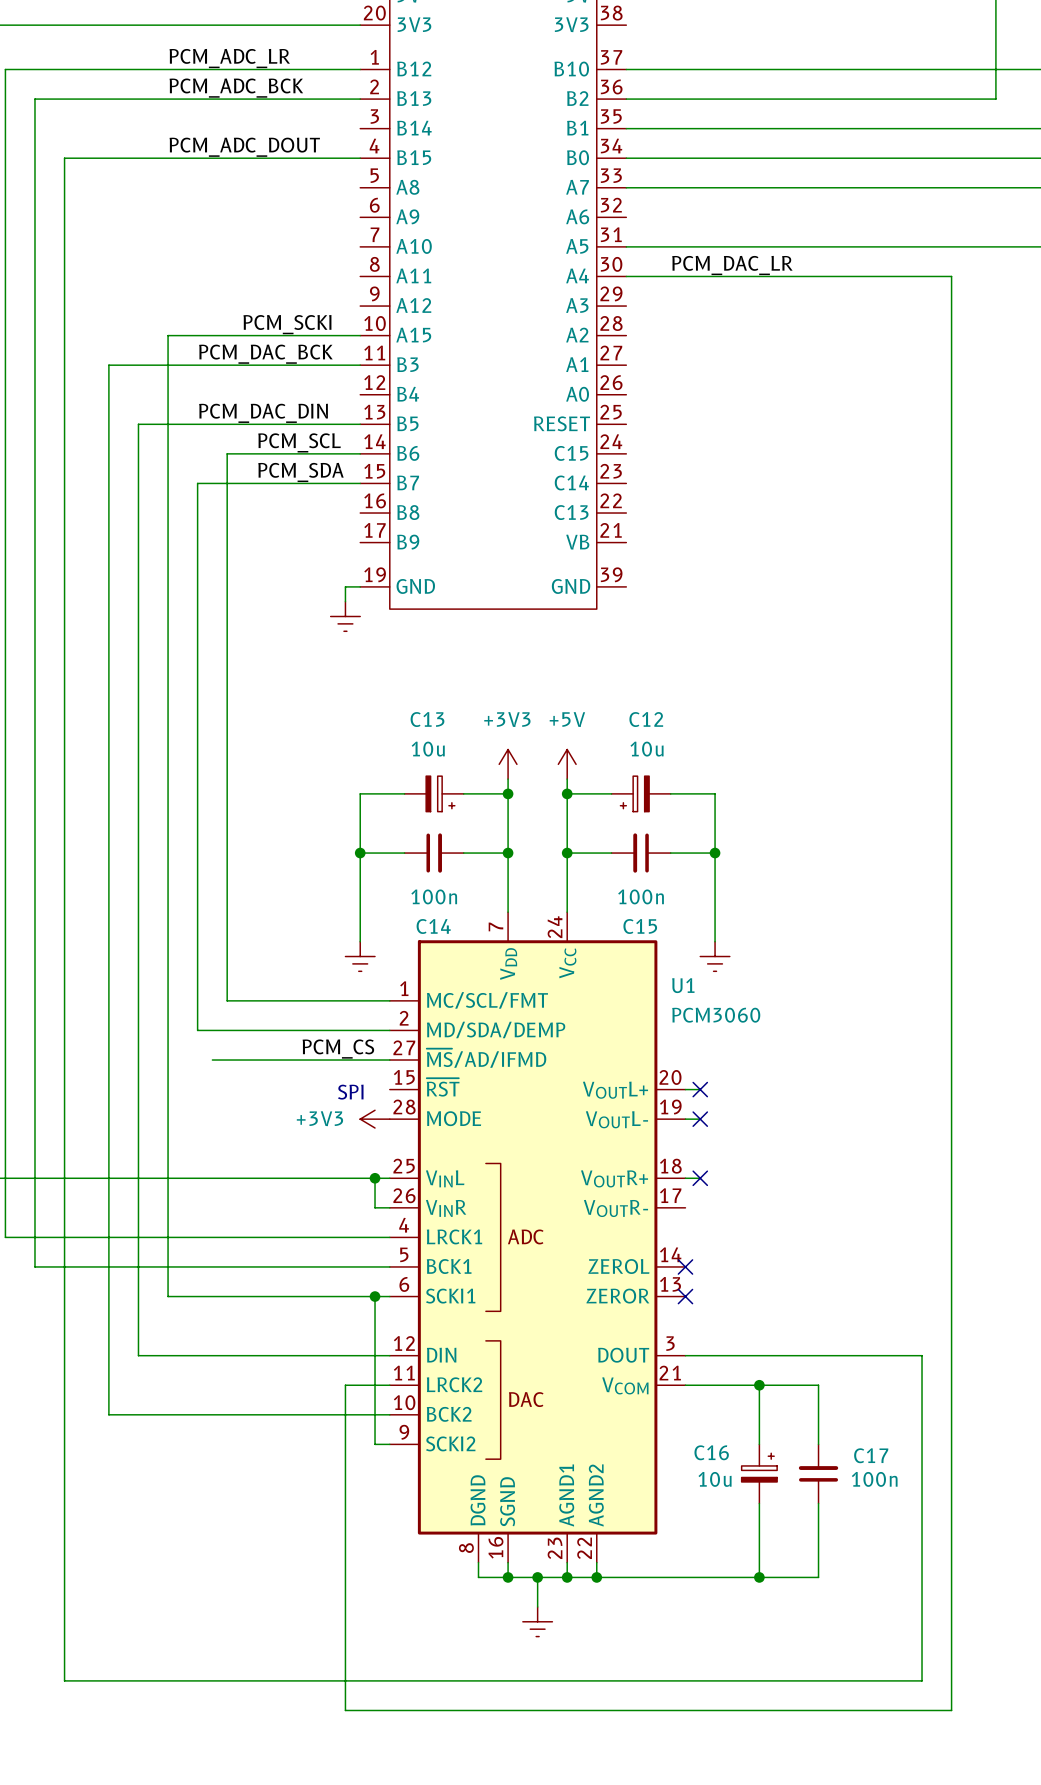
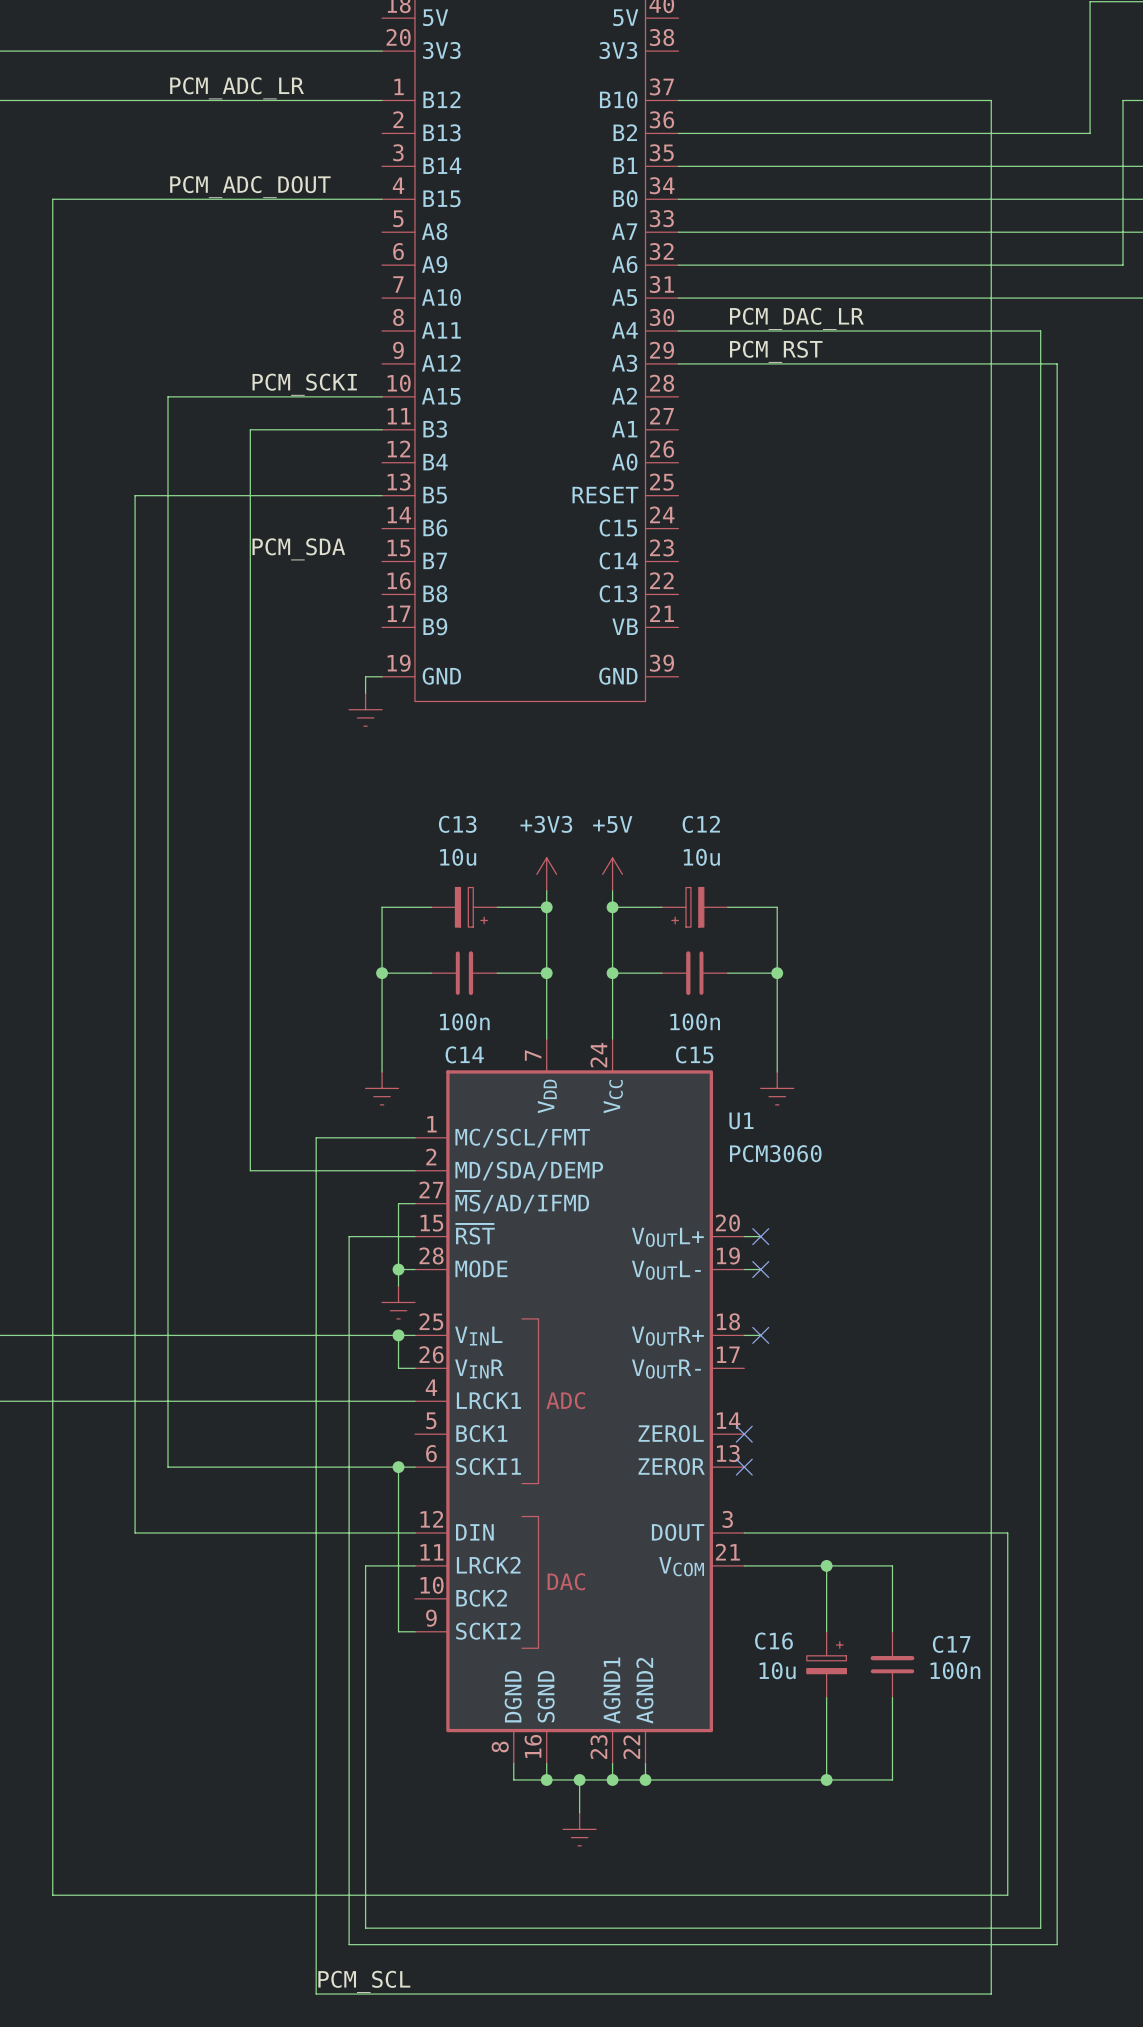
wire: (907, 69) (1025, 69) -> (678, 265) (1123, 265) (1123, 100)
label: PCM_ADC_BCK (236, 88) -> none
wire: (360, 99) (34, 99) (34, 1266) (389, 1266) -> none
label: none -> PCM_RST (776, 351)
wire: none -> (678, 363) (1057, 363) (1057, 1944) (349, 1944) (349, 1236) (414, 1236)
label: PCM_DAC_BCK (265, 354) -> none
wire: (241, 365) (108, 365) (108, 1414) (389, 1414) -> none
label: PCM_DAC_DIN (263, 413) -> none
label: PCM_SCL (299, 442) -> none
wire: (360, 453) (227, 453) (227, 1000) (301, 1000) -> (991, 100) (991, 1994) (316, 1994) (316, 1137)
label position: PCM_SDA (300, 472) -> PCM_SDA (298, 549)
wire: (360, 483) (197, 483) (197, 1030) (241, 1030) -> (250, 429) (250, 1170)
label: PCM_CS (338, 1049) -> none
wire: (212, 1060) (375, 1060) -> (398, 1286) (398, 1203)
text: SPI (350, 1092) -> none
power symbol: +3V3 (375, 1119) -> none
junction: none -> (398, 1269)
power symbol: none -> (398, 1302)
label: none -> PCM_SCL (364, 1981)

